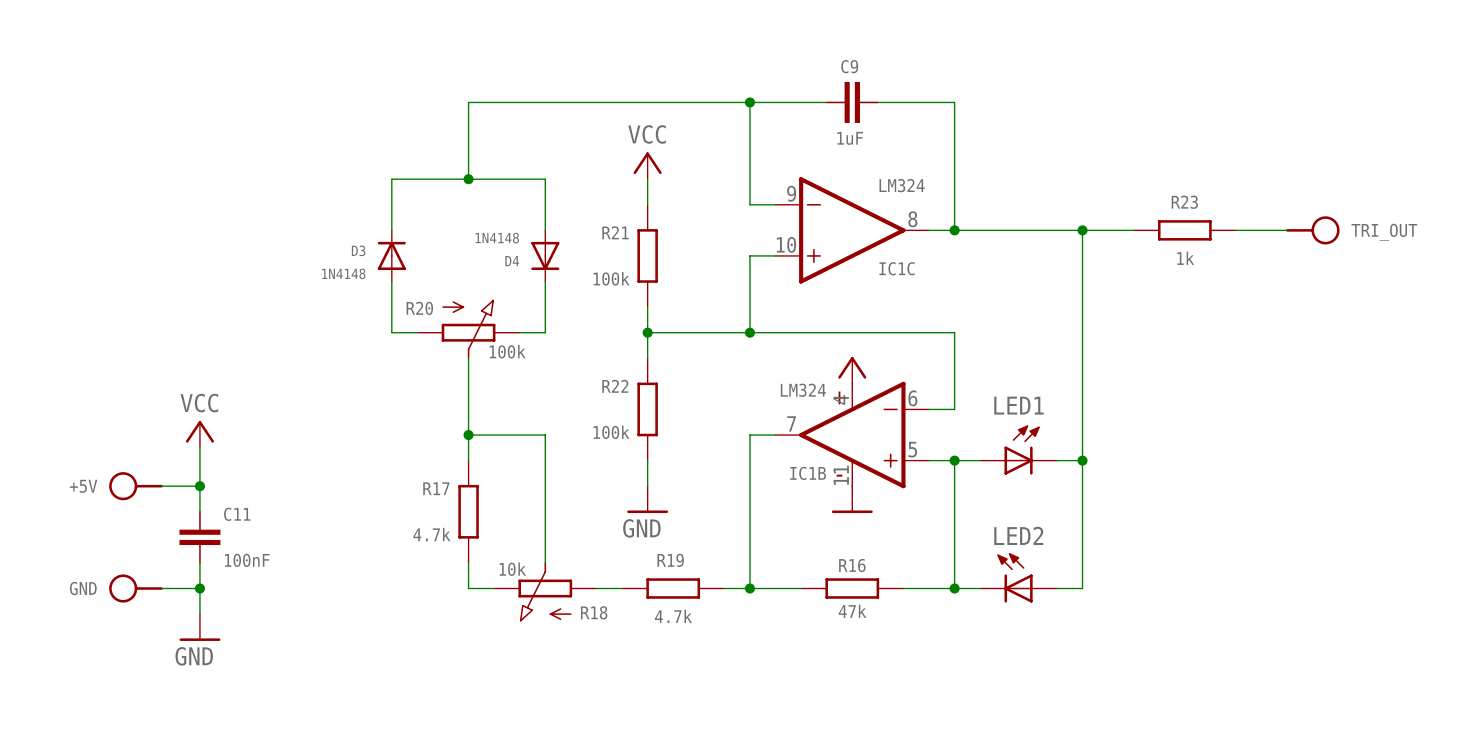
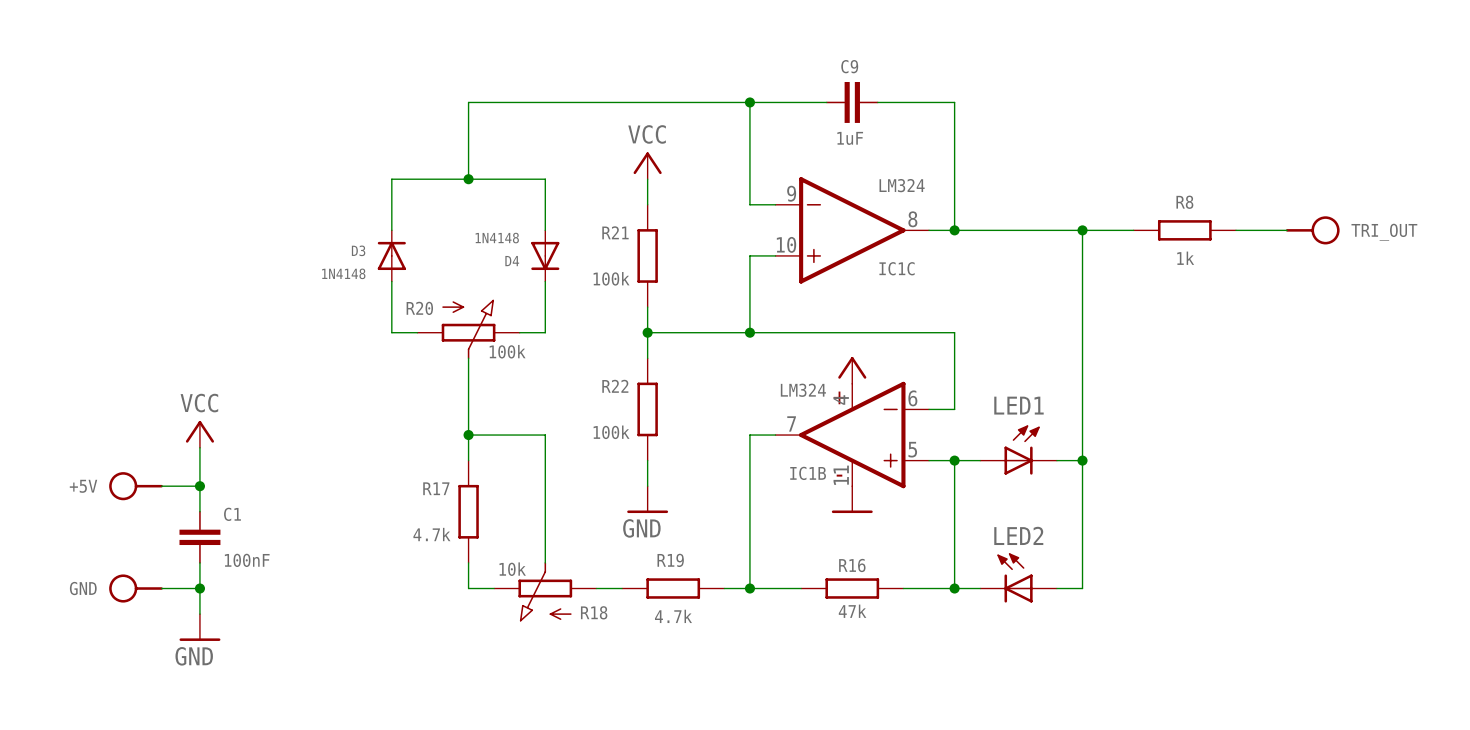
R23 name: R23 (1184, 202) -> R8 (1184, 202)
C11 name: C11 (237, 514) -> C1 (232, 514)

